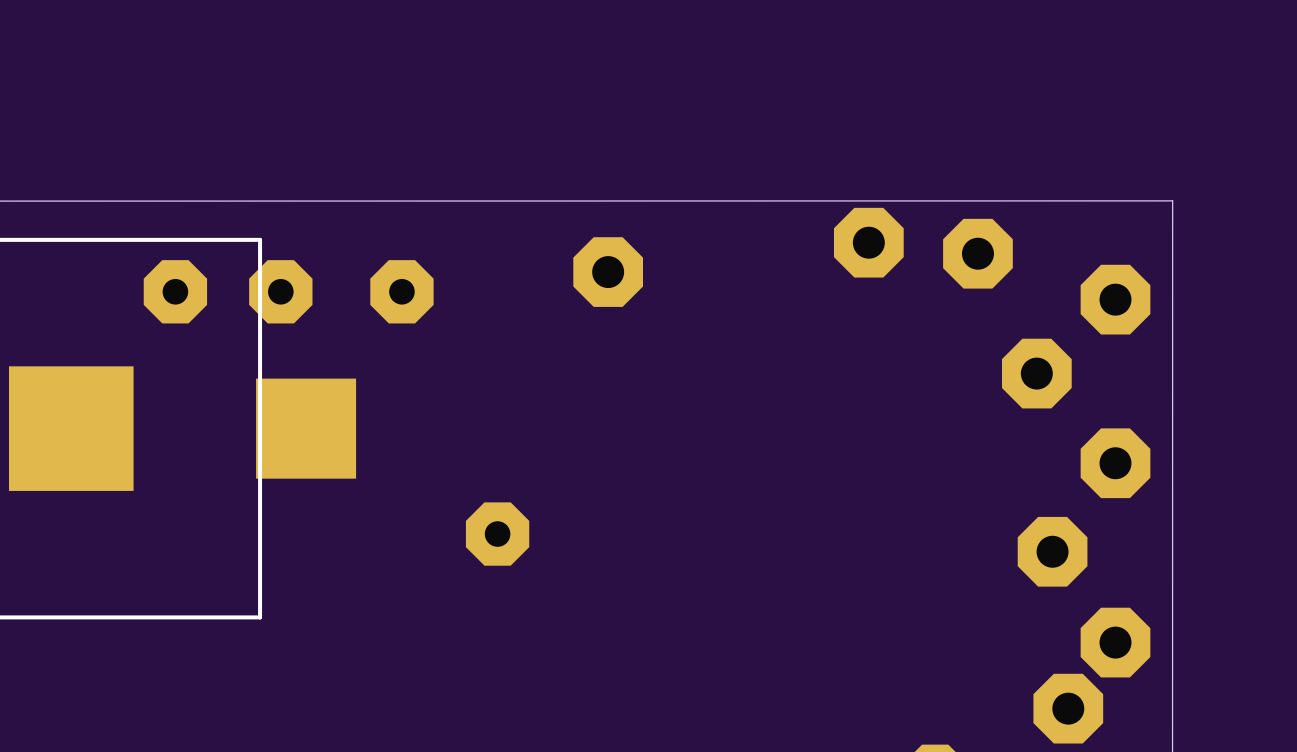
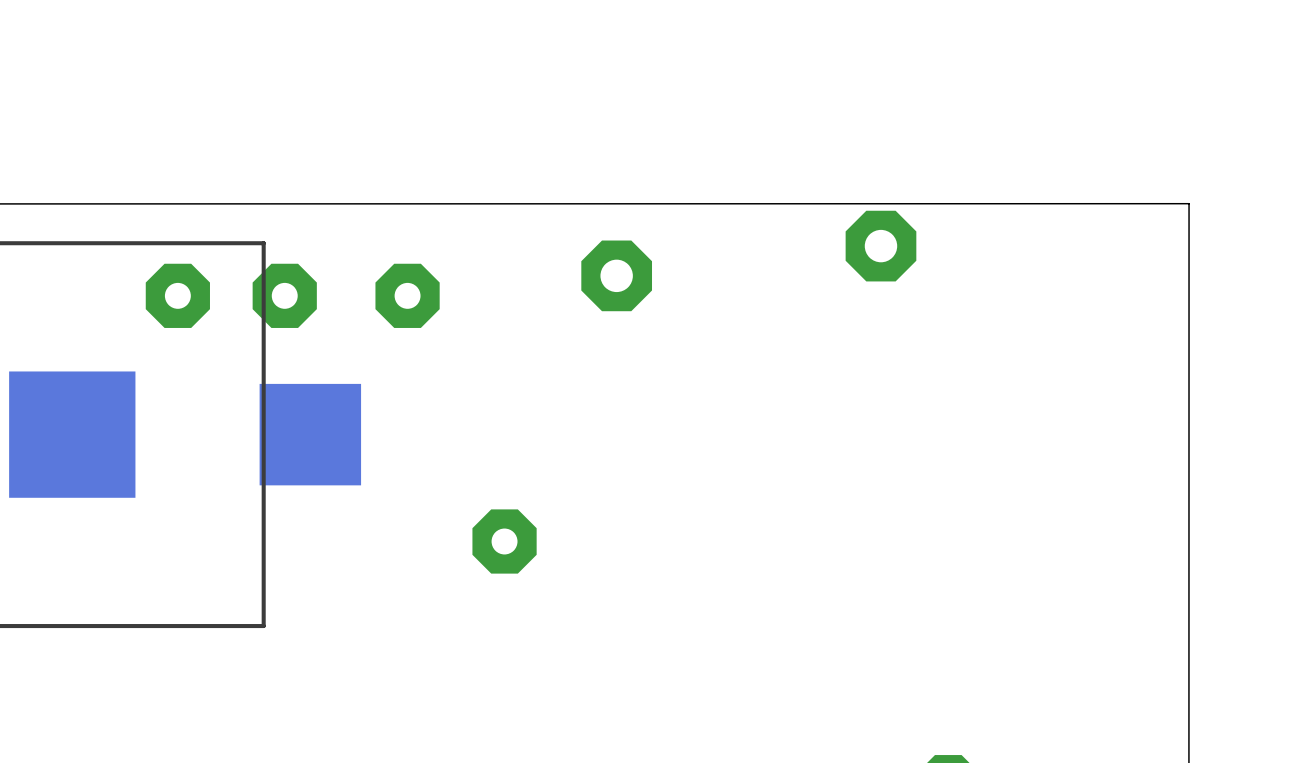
part: (977, 253) -> none
part: (1115, 299) -> none
part: (1036, 373) -> none
part: (1115, 463) -> none
part: (1052, 551) -> none
part: (1115, 642) -> none
part: (1068, 708) -> none

